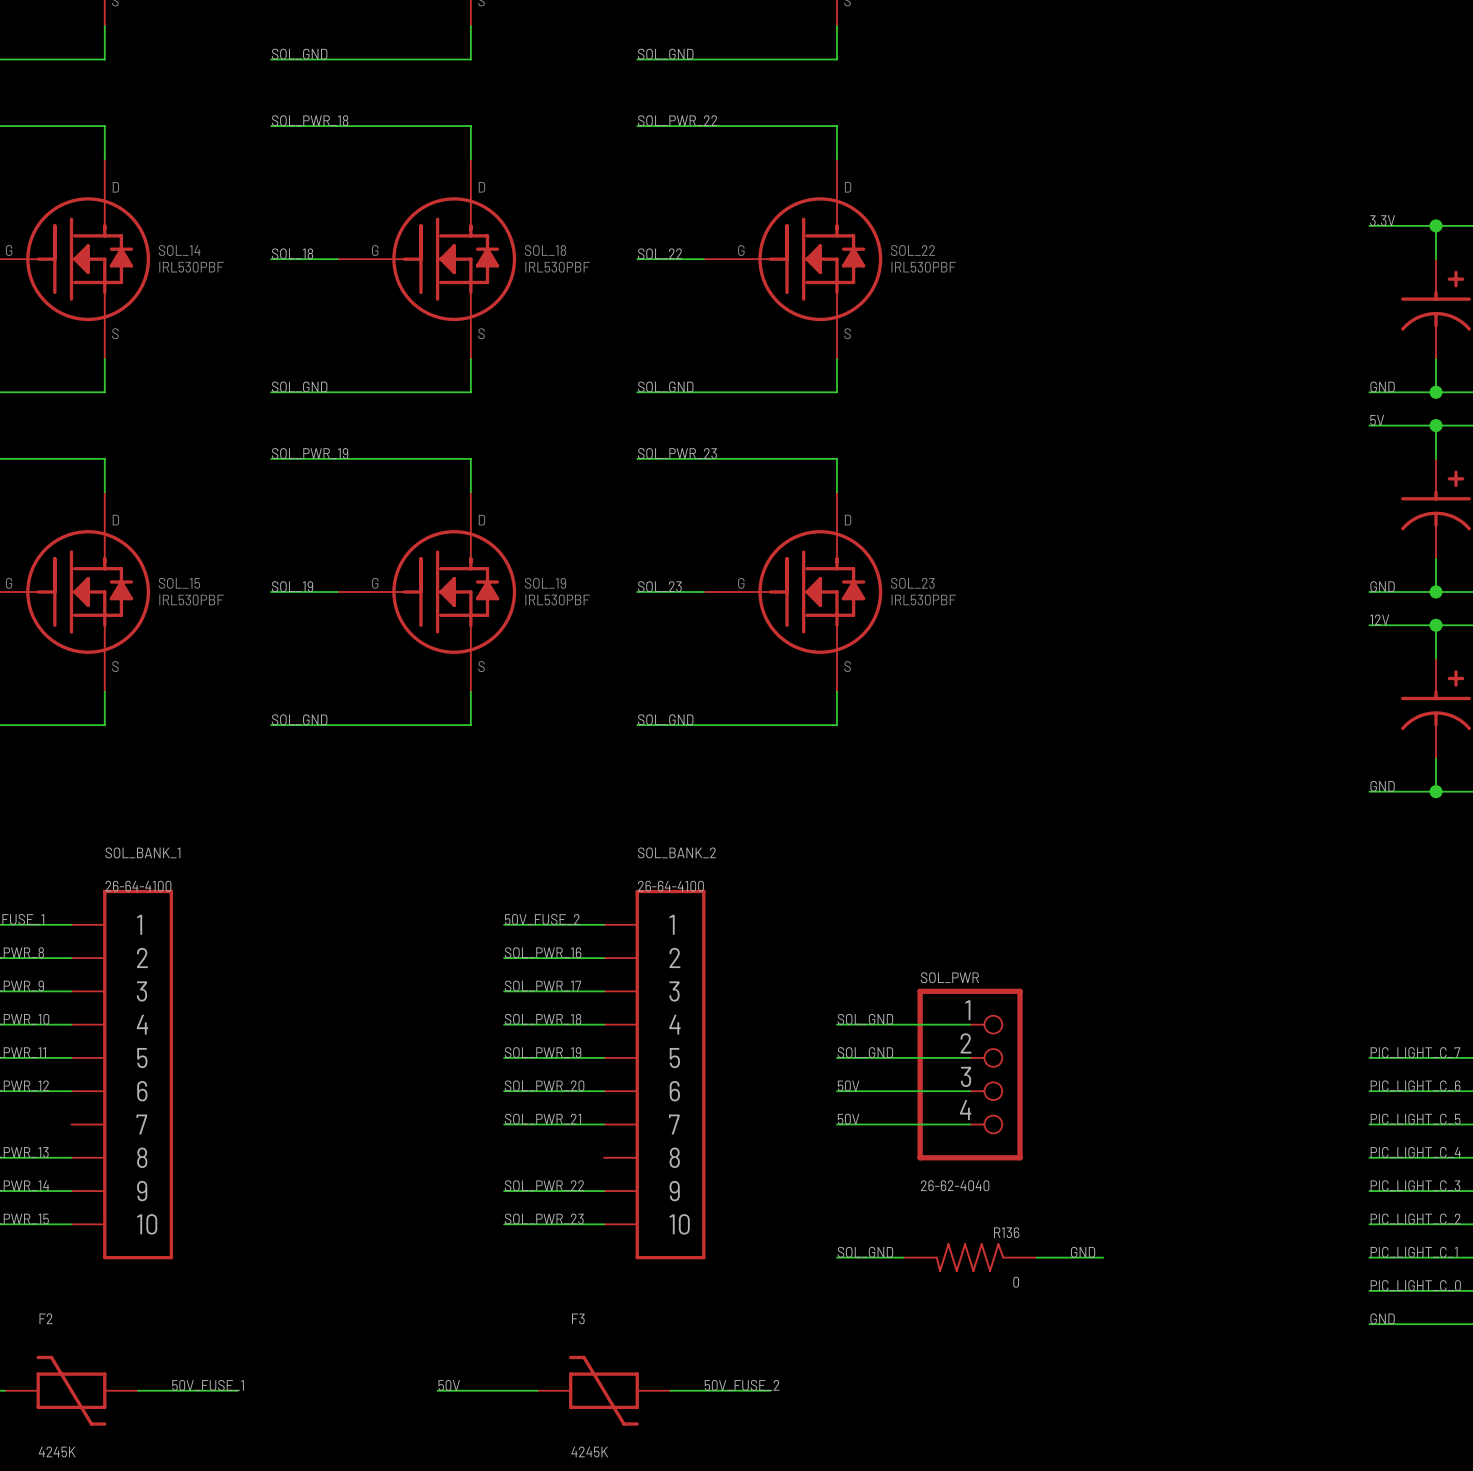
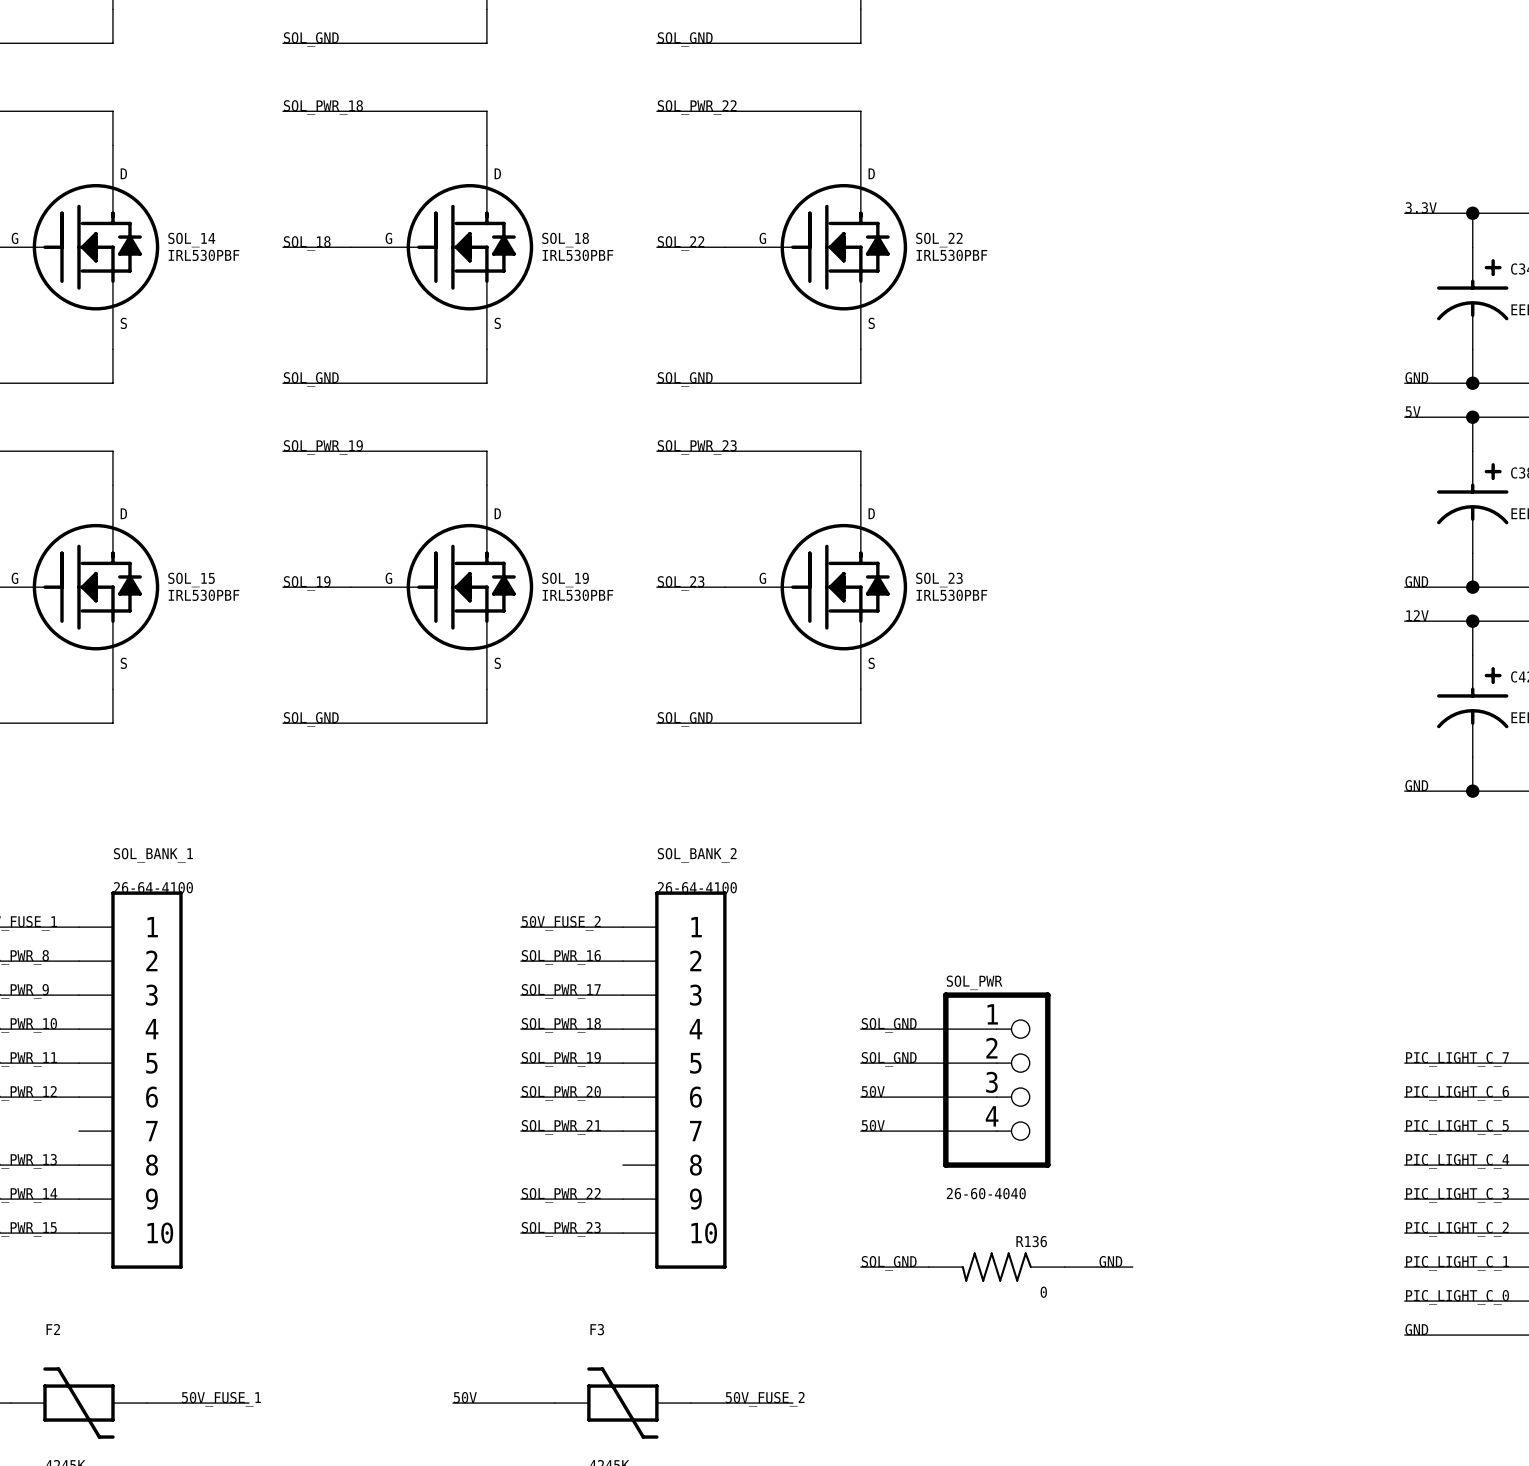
SOL_PWR value: 26-62-4040 (955, 1185) -> 26-60-4040 (986, 1193)

